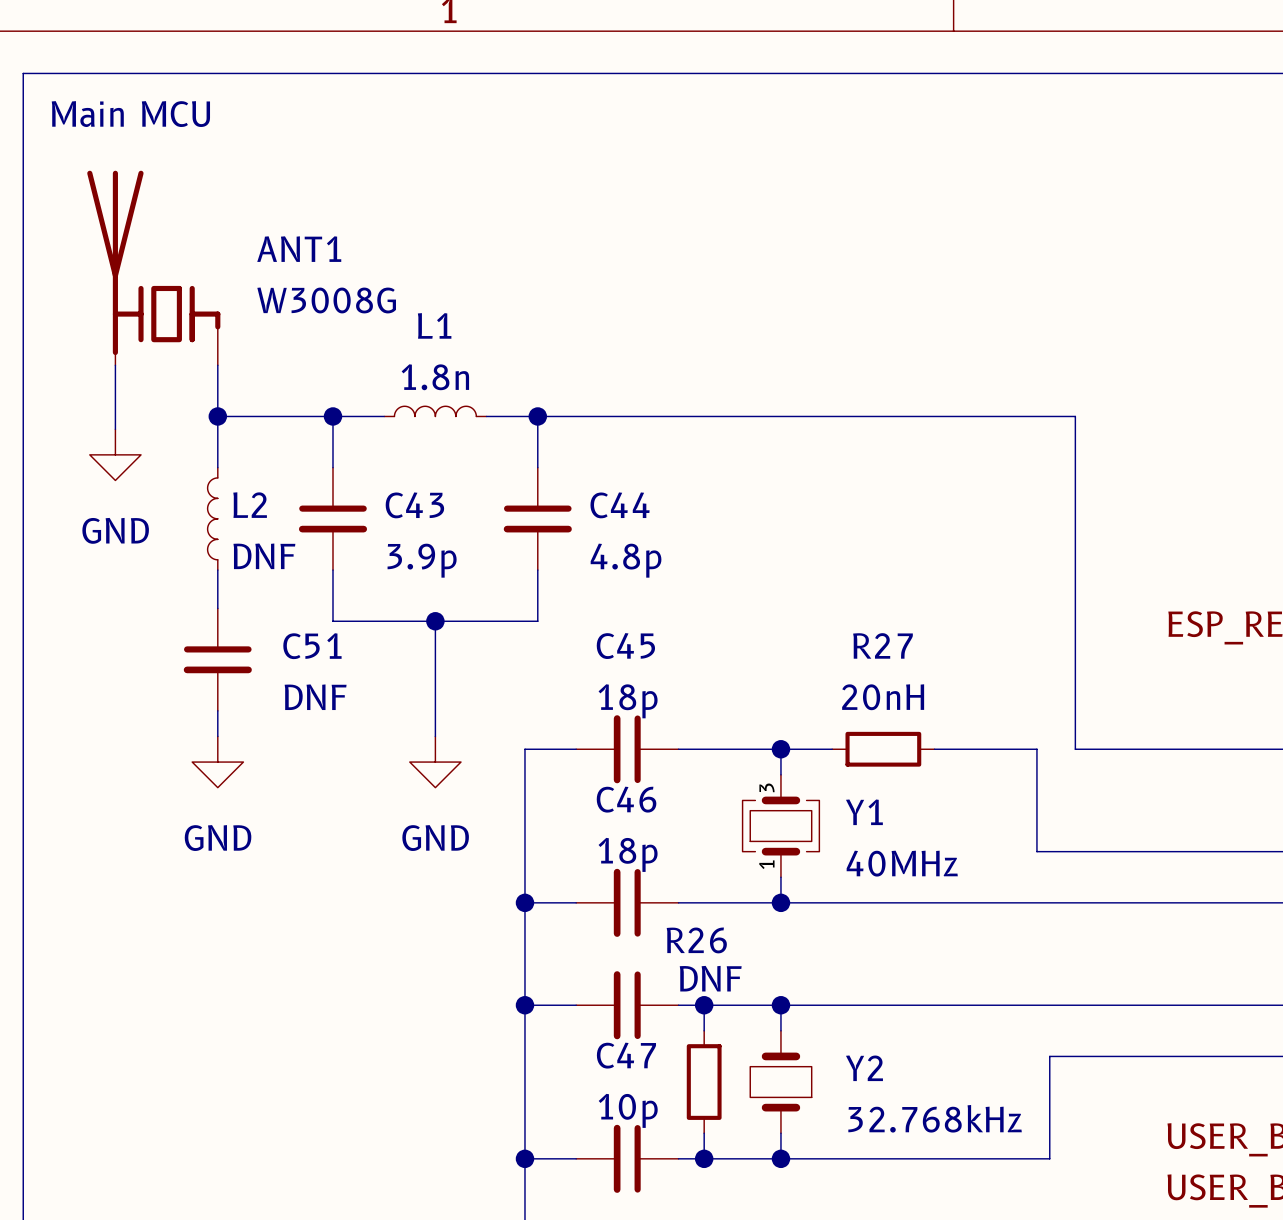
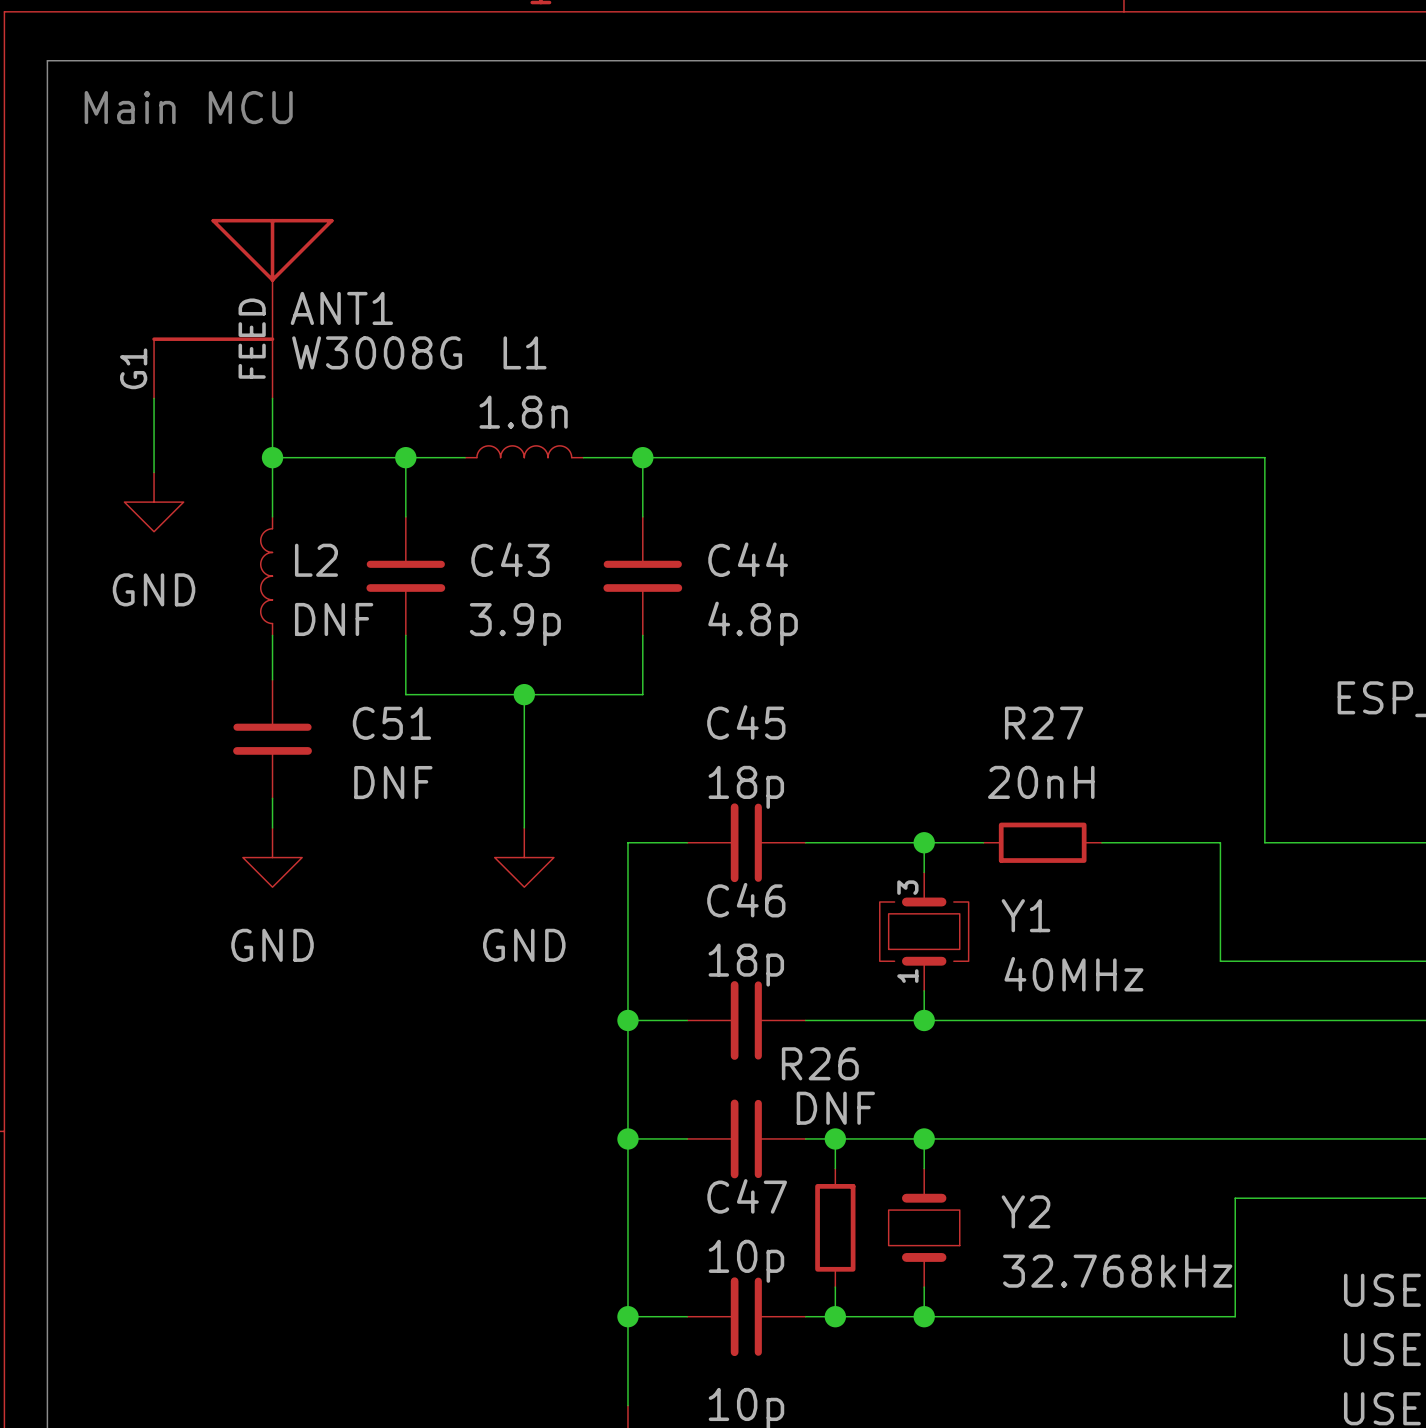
ANT1 symbol: [87, 170, 221, 366] -> [152, 218, 334, 399]
ANT1 name position: ANT1 (299, 249) -> ANT1 (341, 308)
ANT1 value position: W3008G (326, 300) -> W3008G (377, 352)

